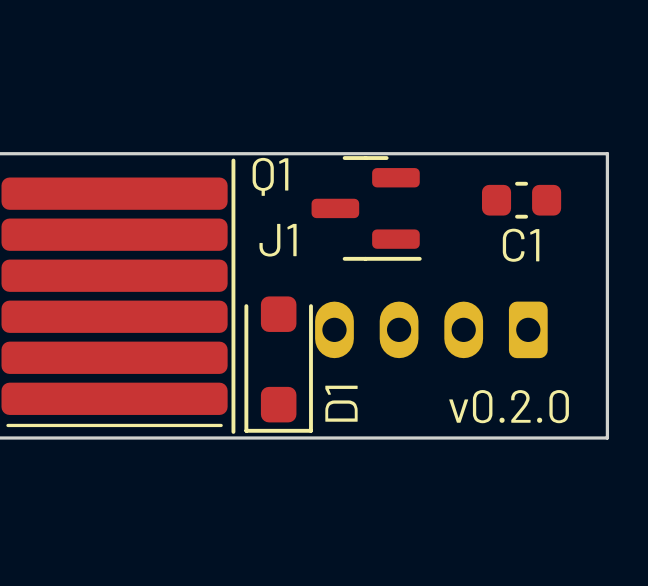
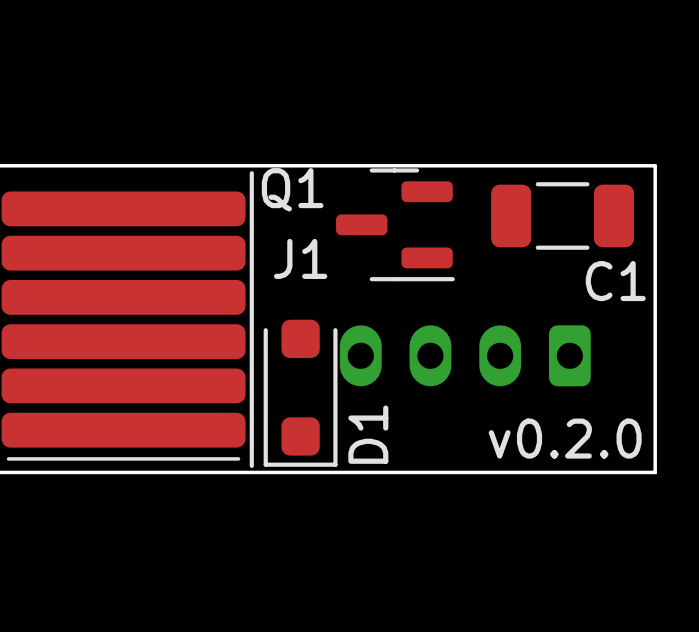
C1 footprint: [481, 181, 562, 219] -> [491, 182, 635, 250]
C1 name position: C1 (521, 245) -> C1 (615, 281)

